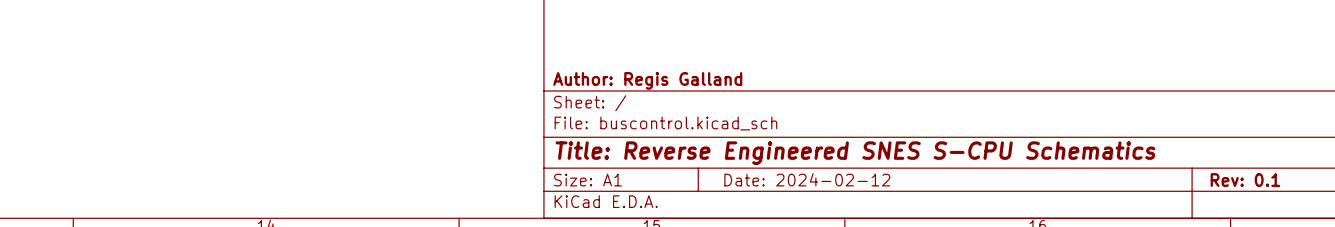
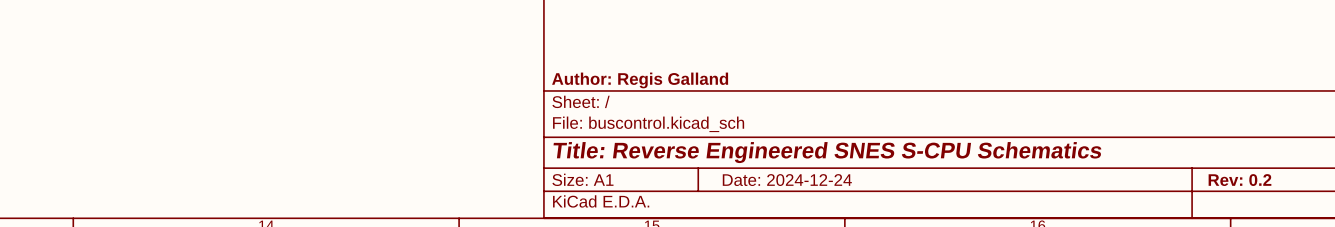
title block: Date: 2024-02-12 (807, 179) -> Date: 2024-12-24 (787, 180)
title block: Rev: 0.1 (1245, 180) -> Rev: 0.2 (1239, 180)

